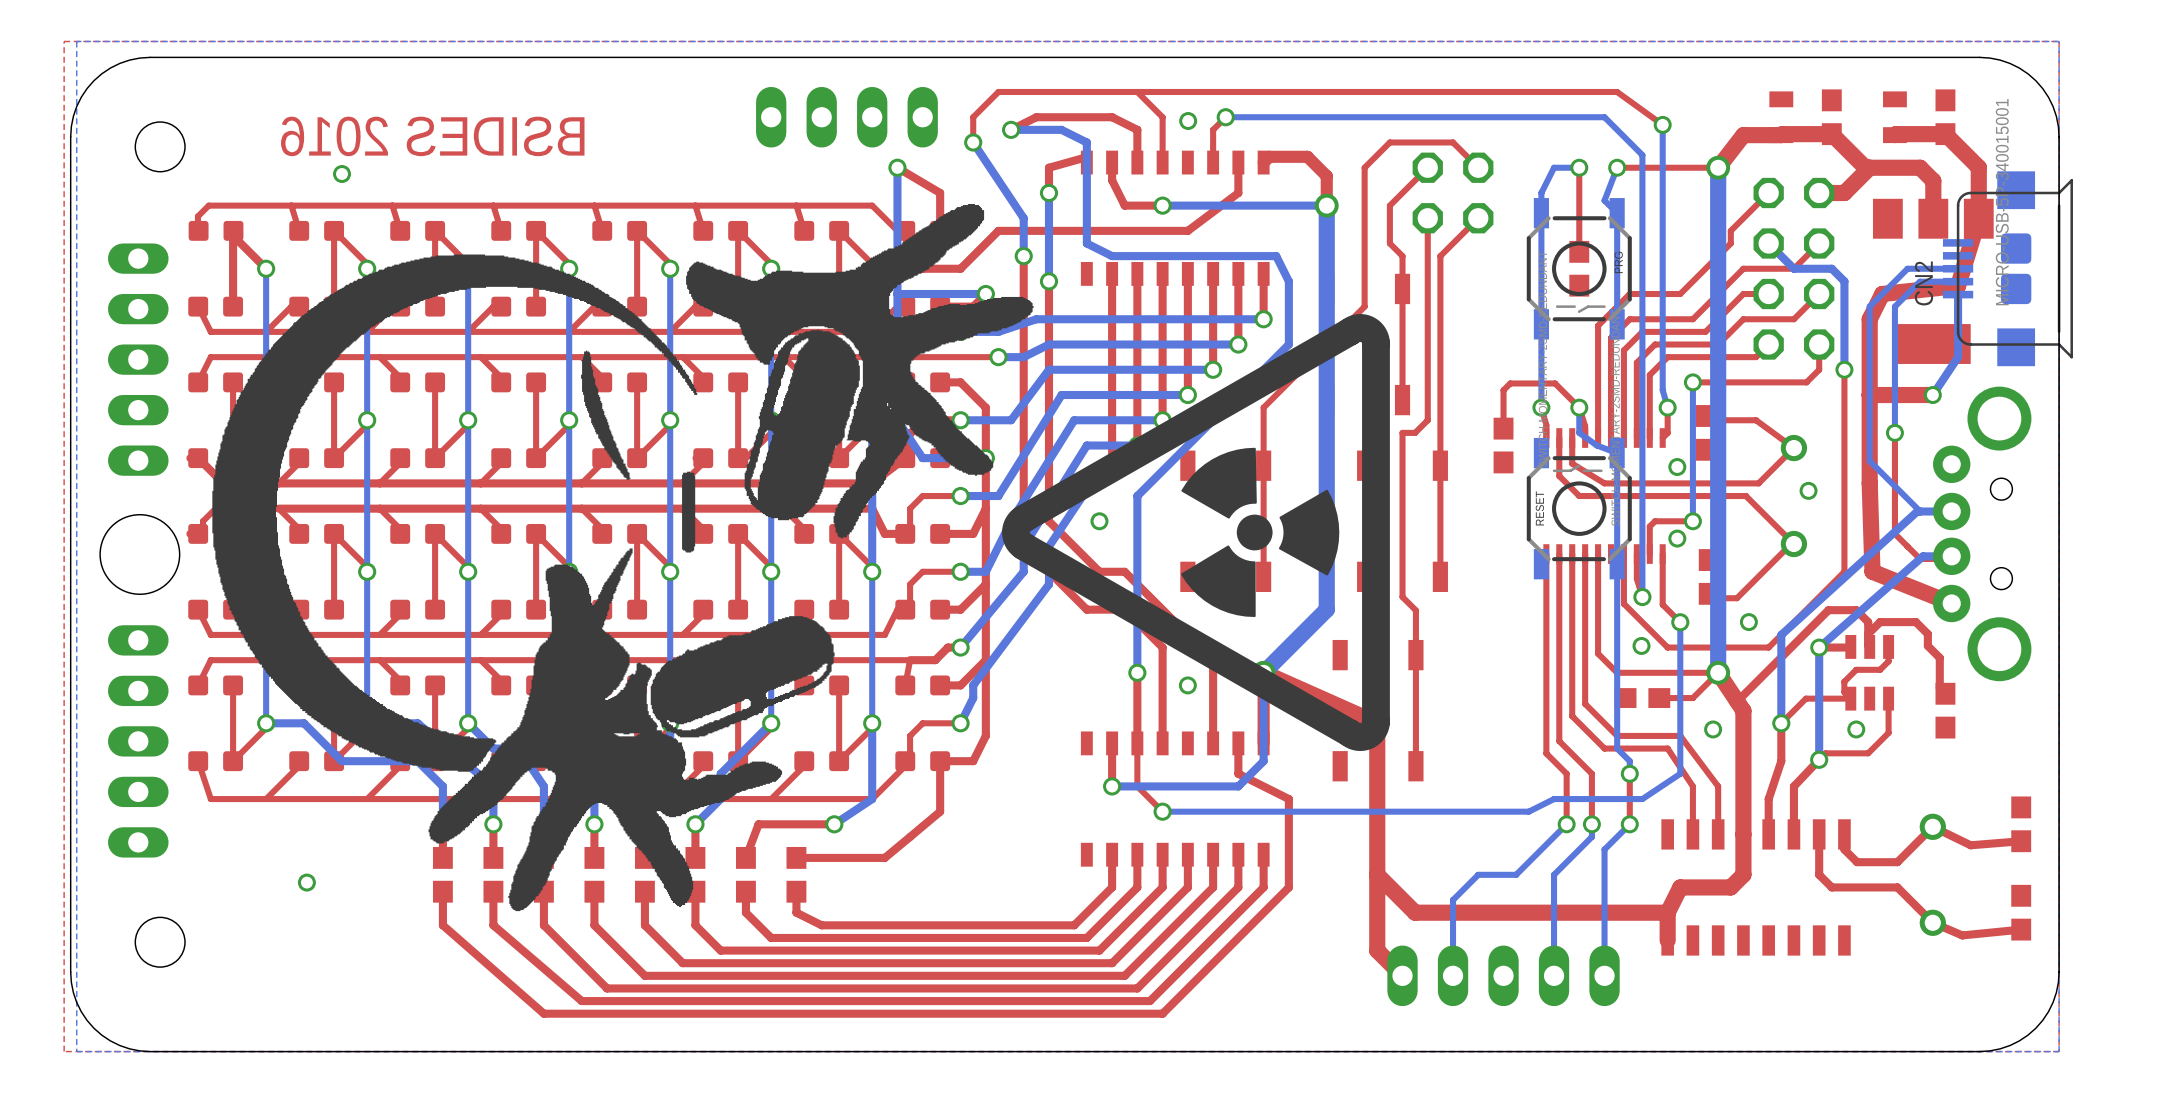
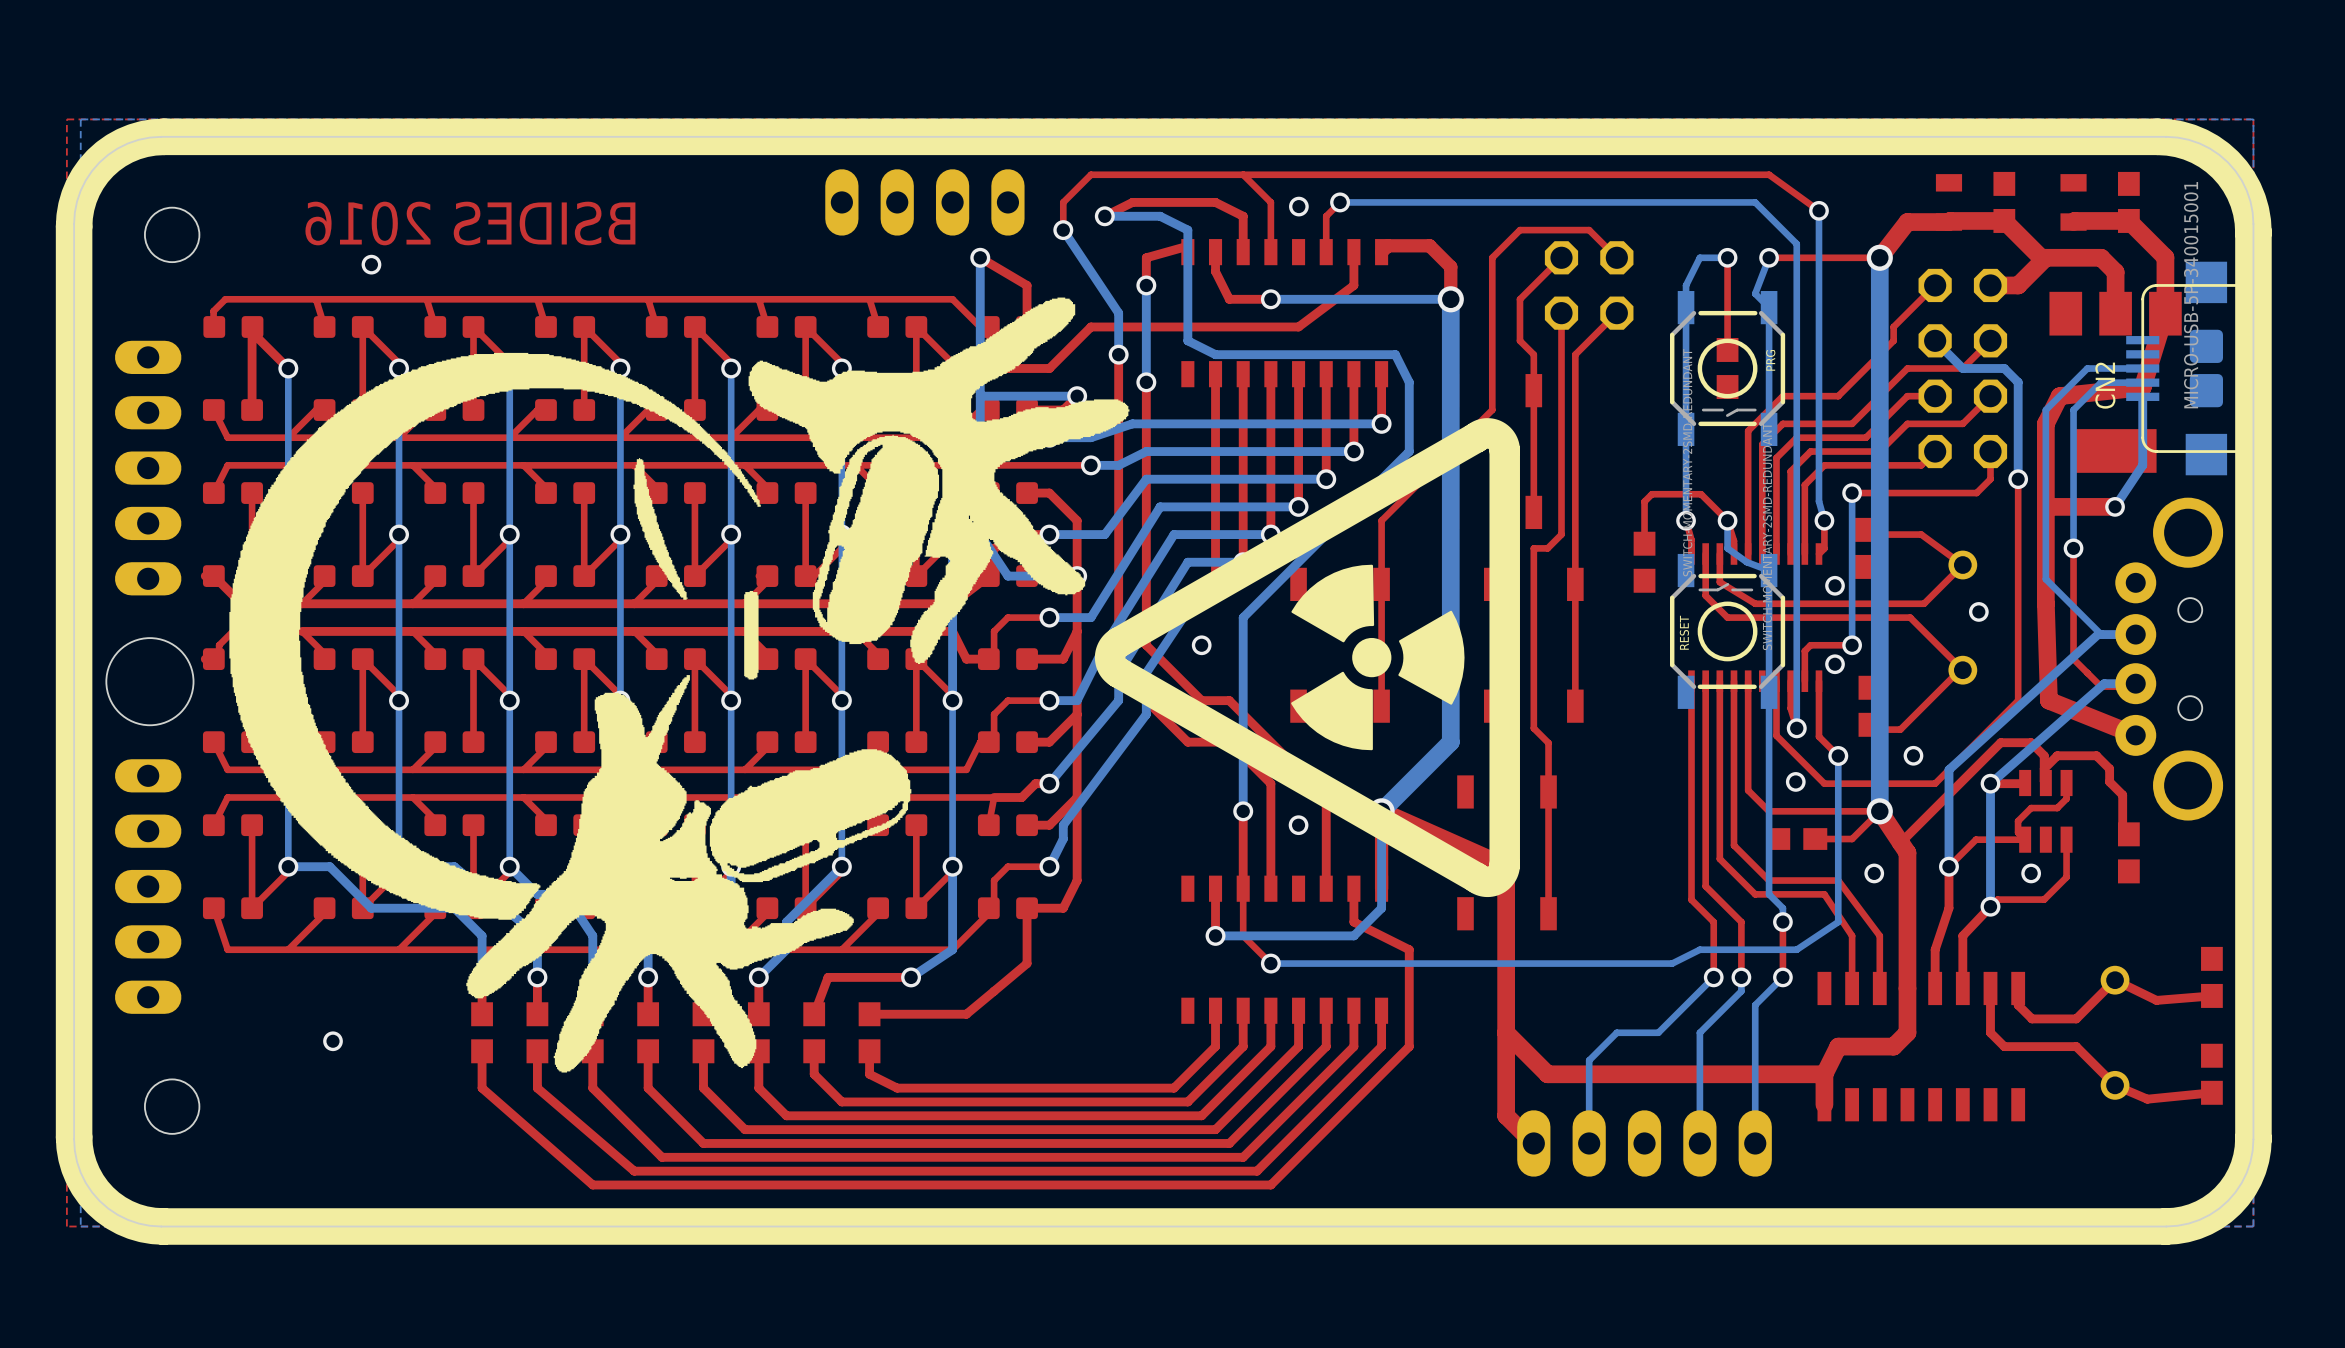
line: none -> (2157, 136) (163, 136) (143, 139) (124, 145) (100, 163) (87, 178) (79, 197) (74, 226) (74, 1137) (76, 1156) (82, 1175) (100, 1200) (115, 1212) (143, 1224) (163, 1226) (2165, 1226) (2185, 1224) (2203, 1217) (2220, 1207) (2240, 1185) (2251, 1158) (2253, 1138) (2253, 232) (2248, 200) (2238, 181) (2225, 164) (2208, 151) (2189, 142) (2157, 136)

